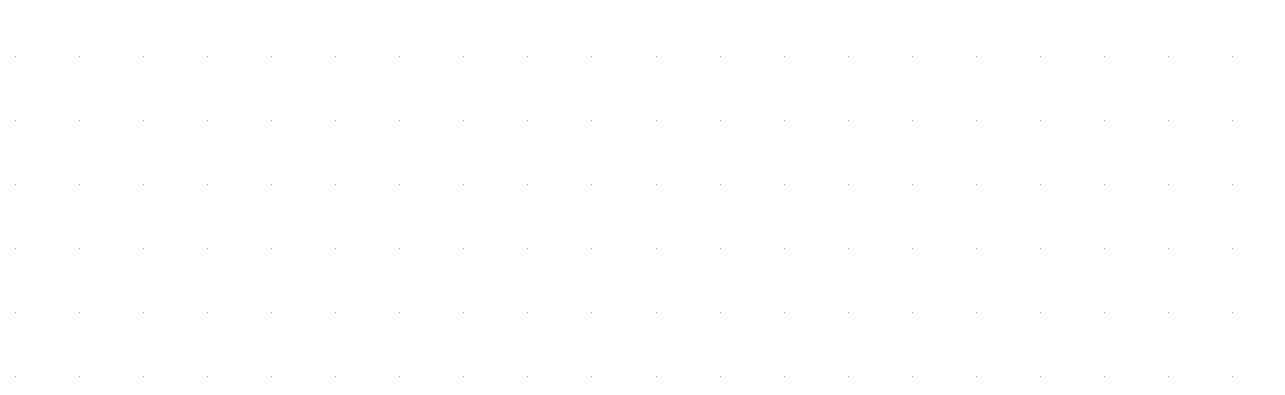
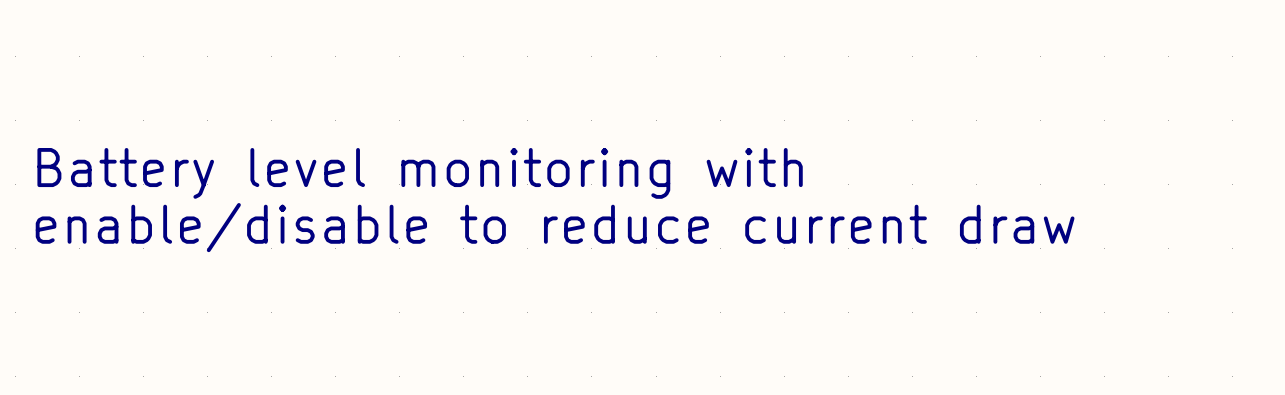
text: none -> Battery level monitoring with (420, 173)
text: none -> enable/disable to reduce current draw (555, 227)

